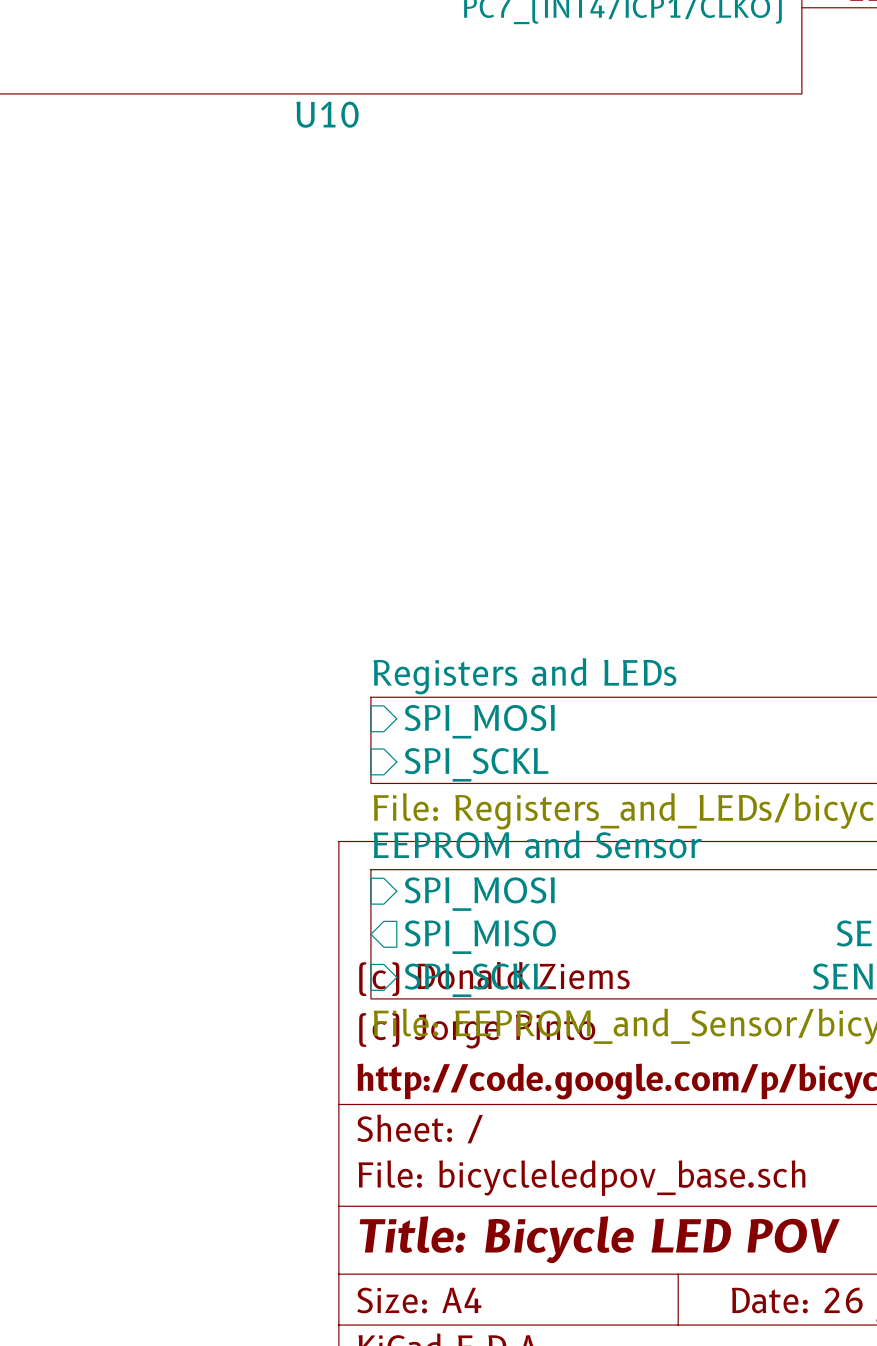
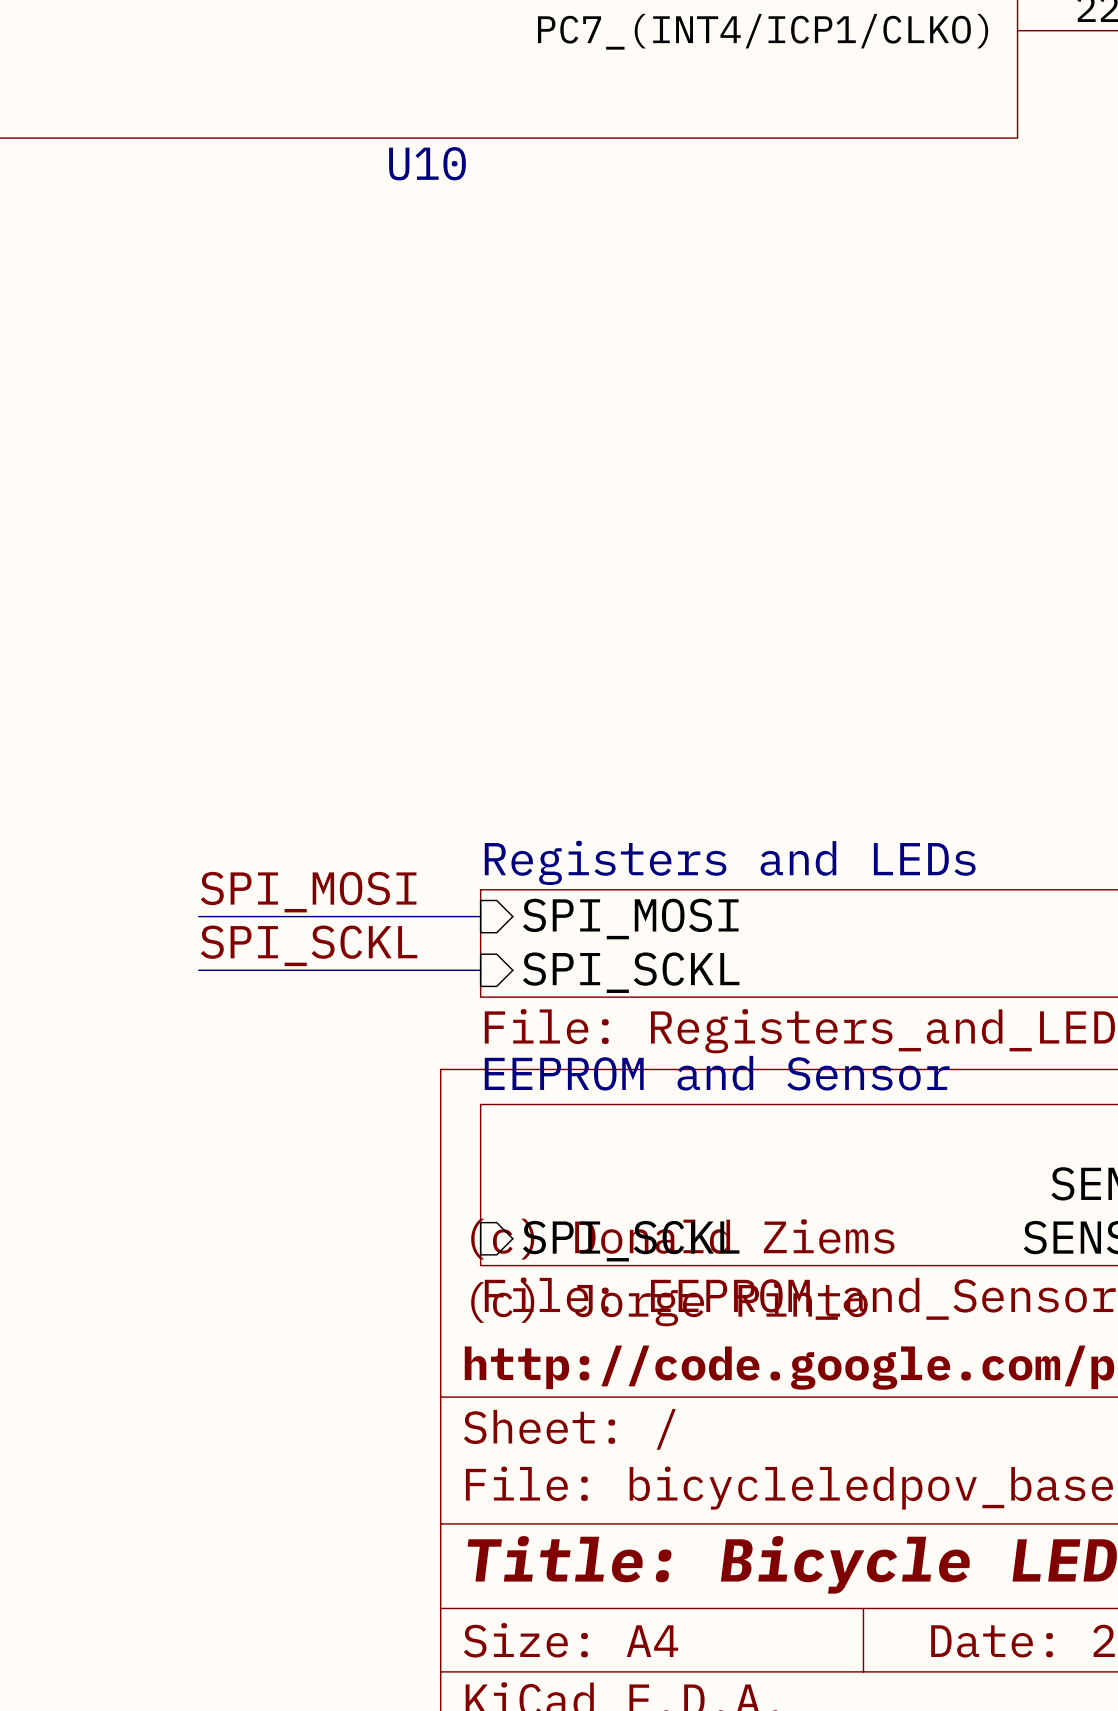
label: none -> SPI_MOSI (308, 892)
wire: none -> (198, 916) (480, 916)
label: none -> SPI_SCKL (309, 945)
wire: none -> (198, 970) (480, 970)
sheet pin: SPI_MOSI (479, 894) -> none
sheet pin: SPI_MISO (480, 937) -> none

